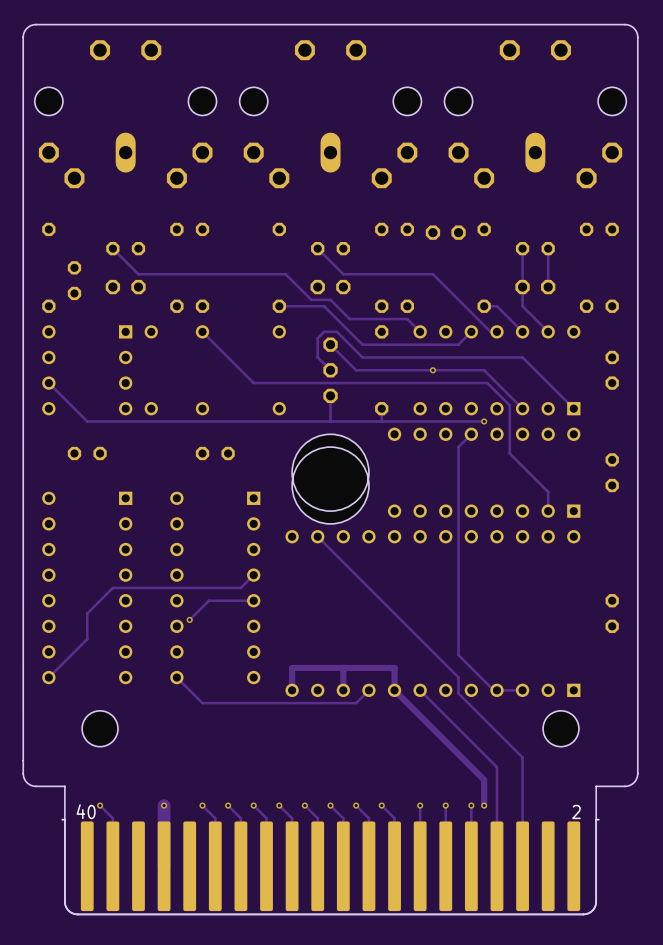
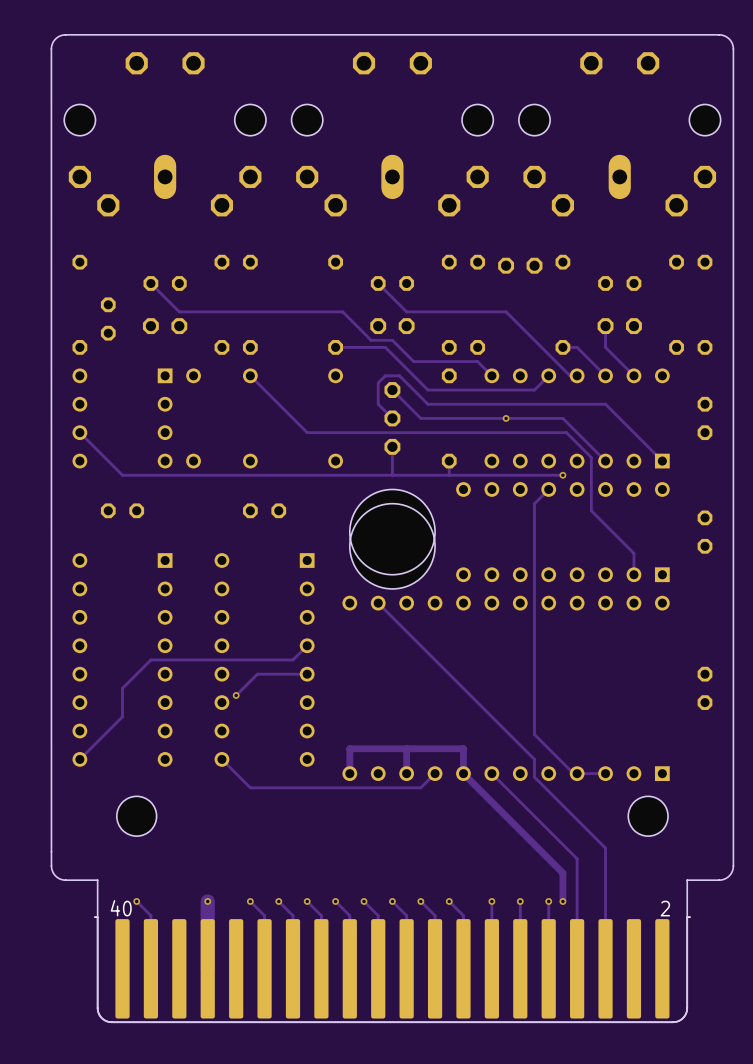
track: (522, 248) (522, 287) -> none
track: (548, 248) (548, 287) -> none

